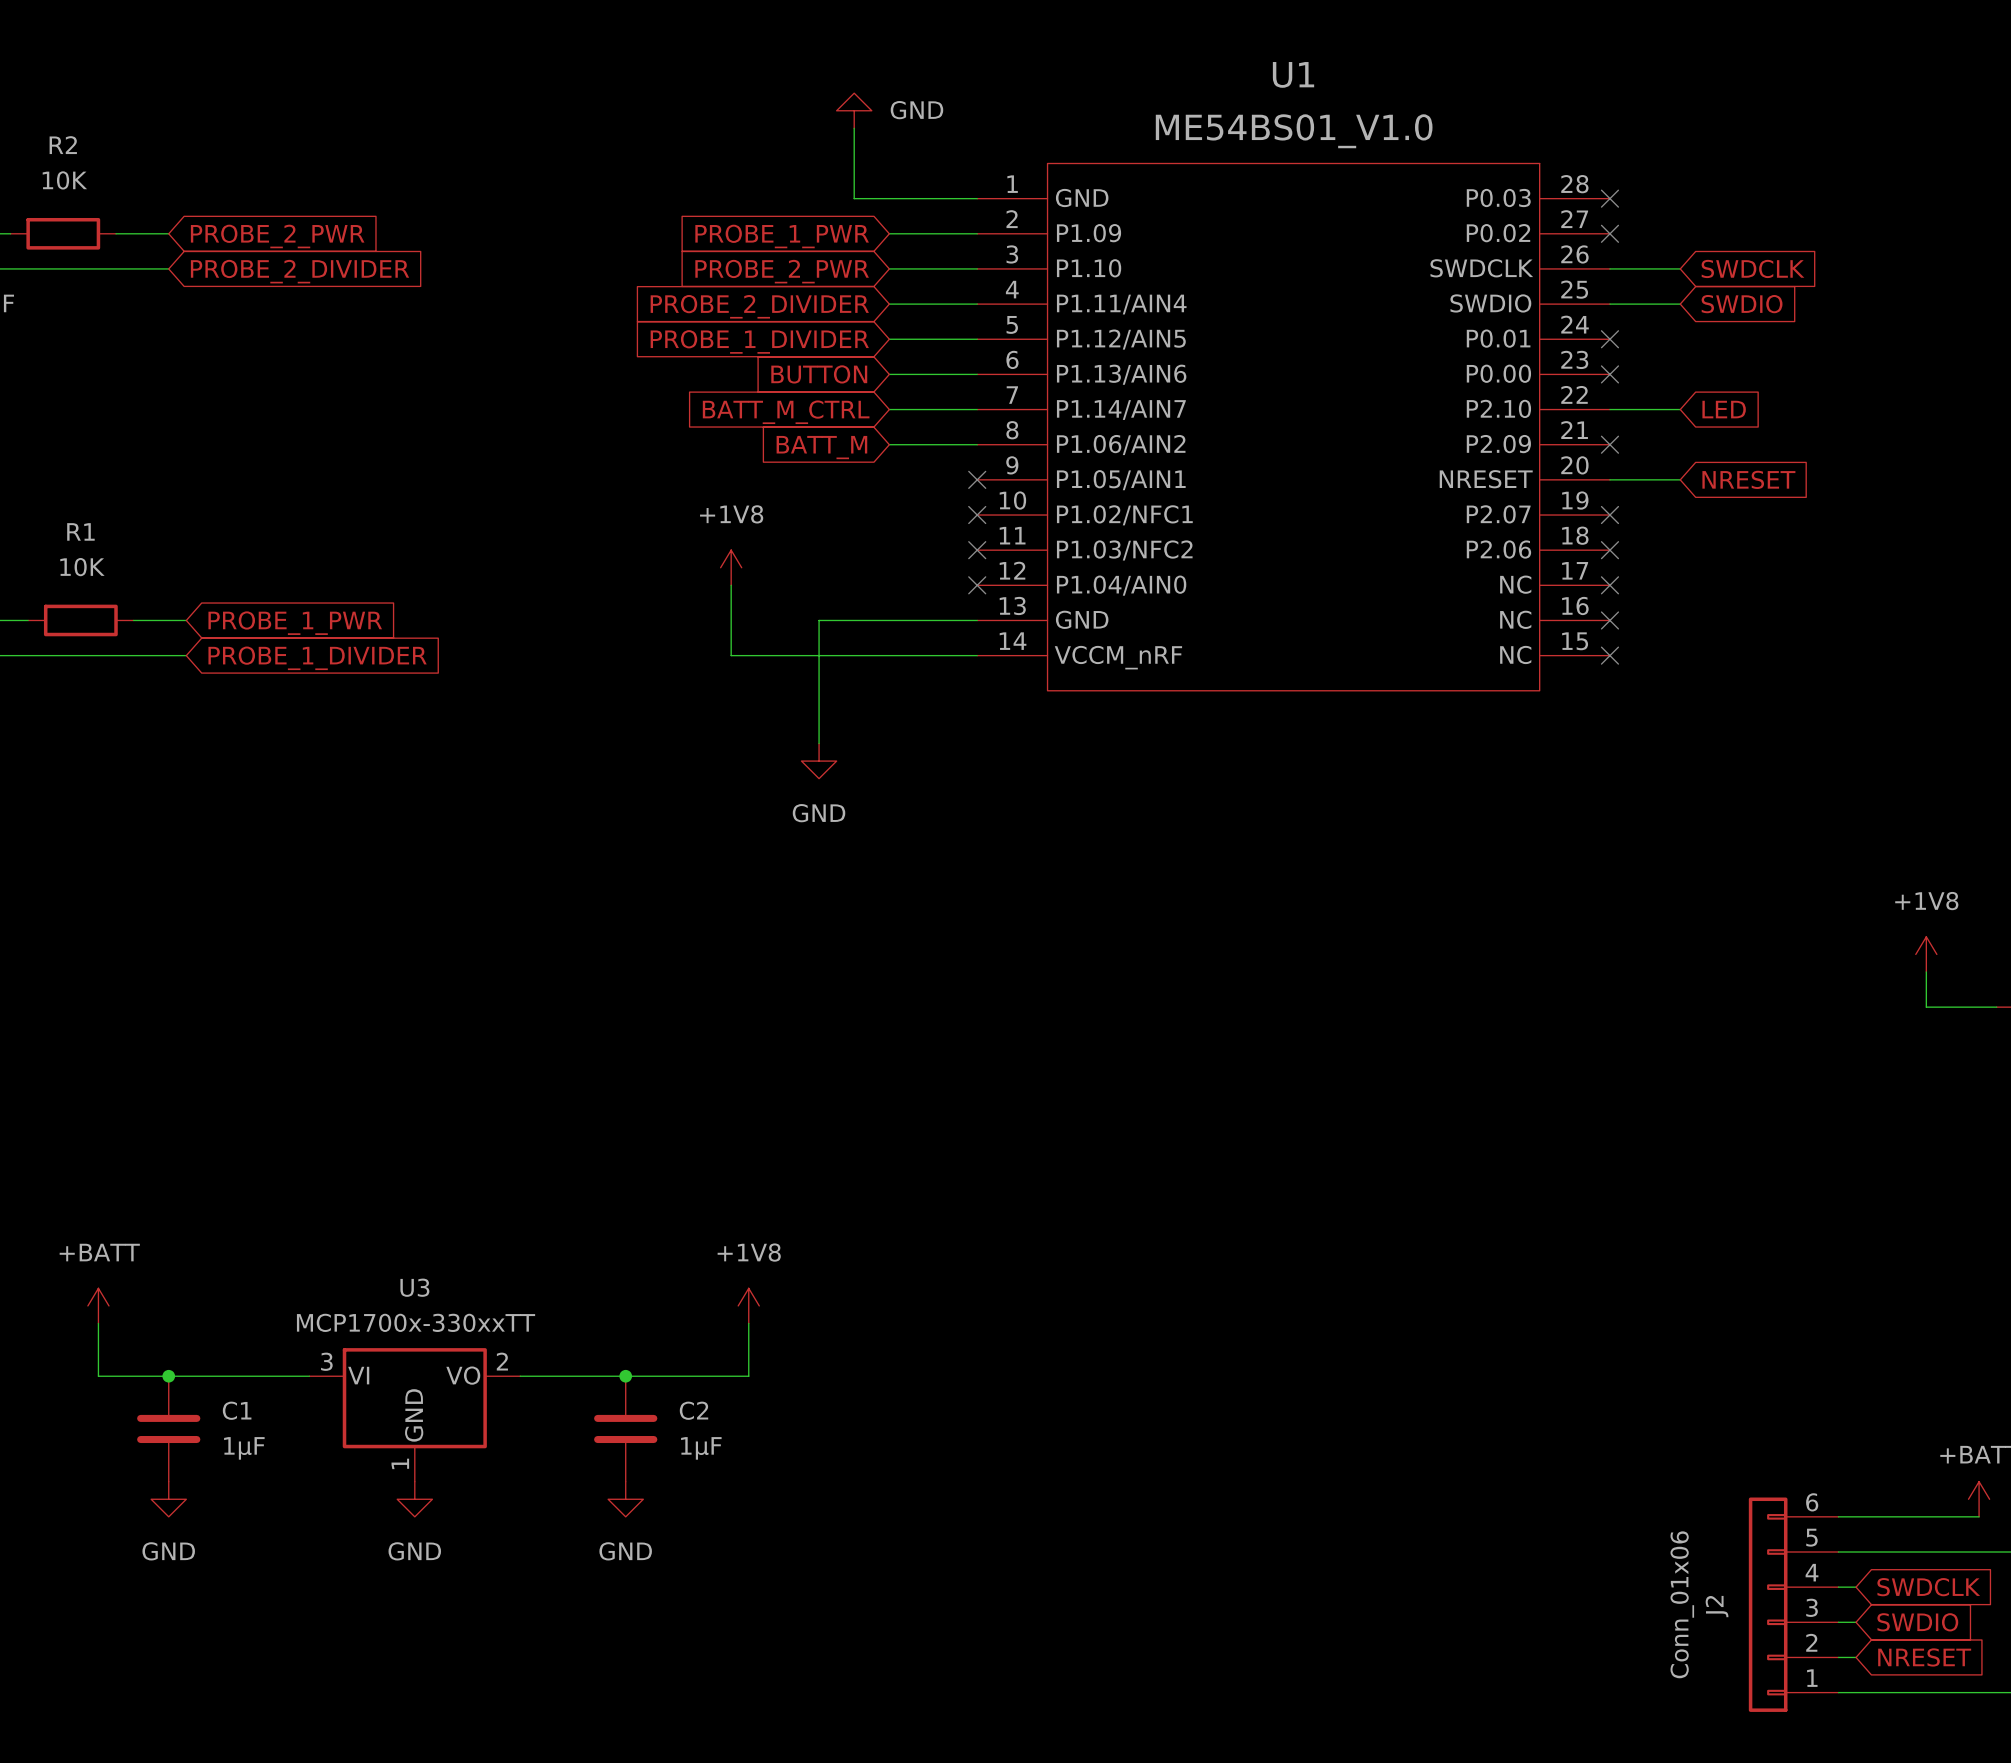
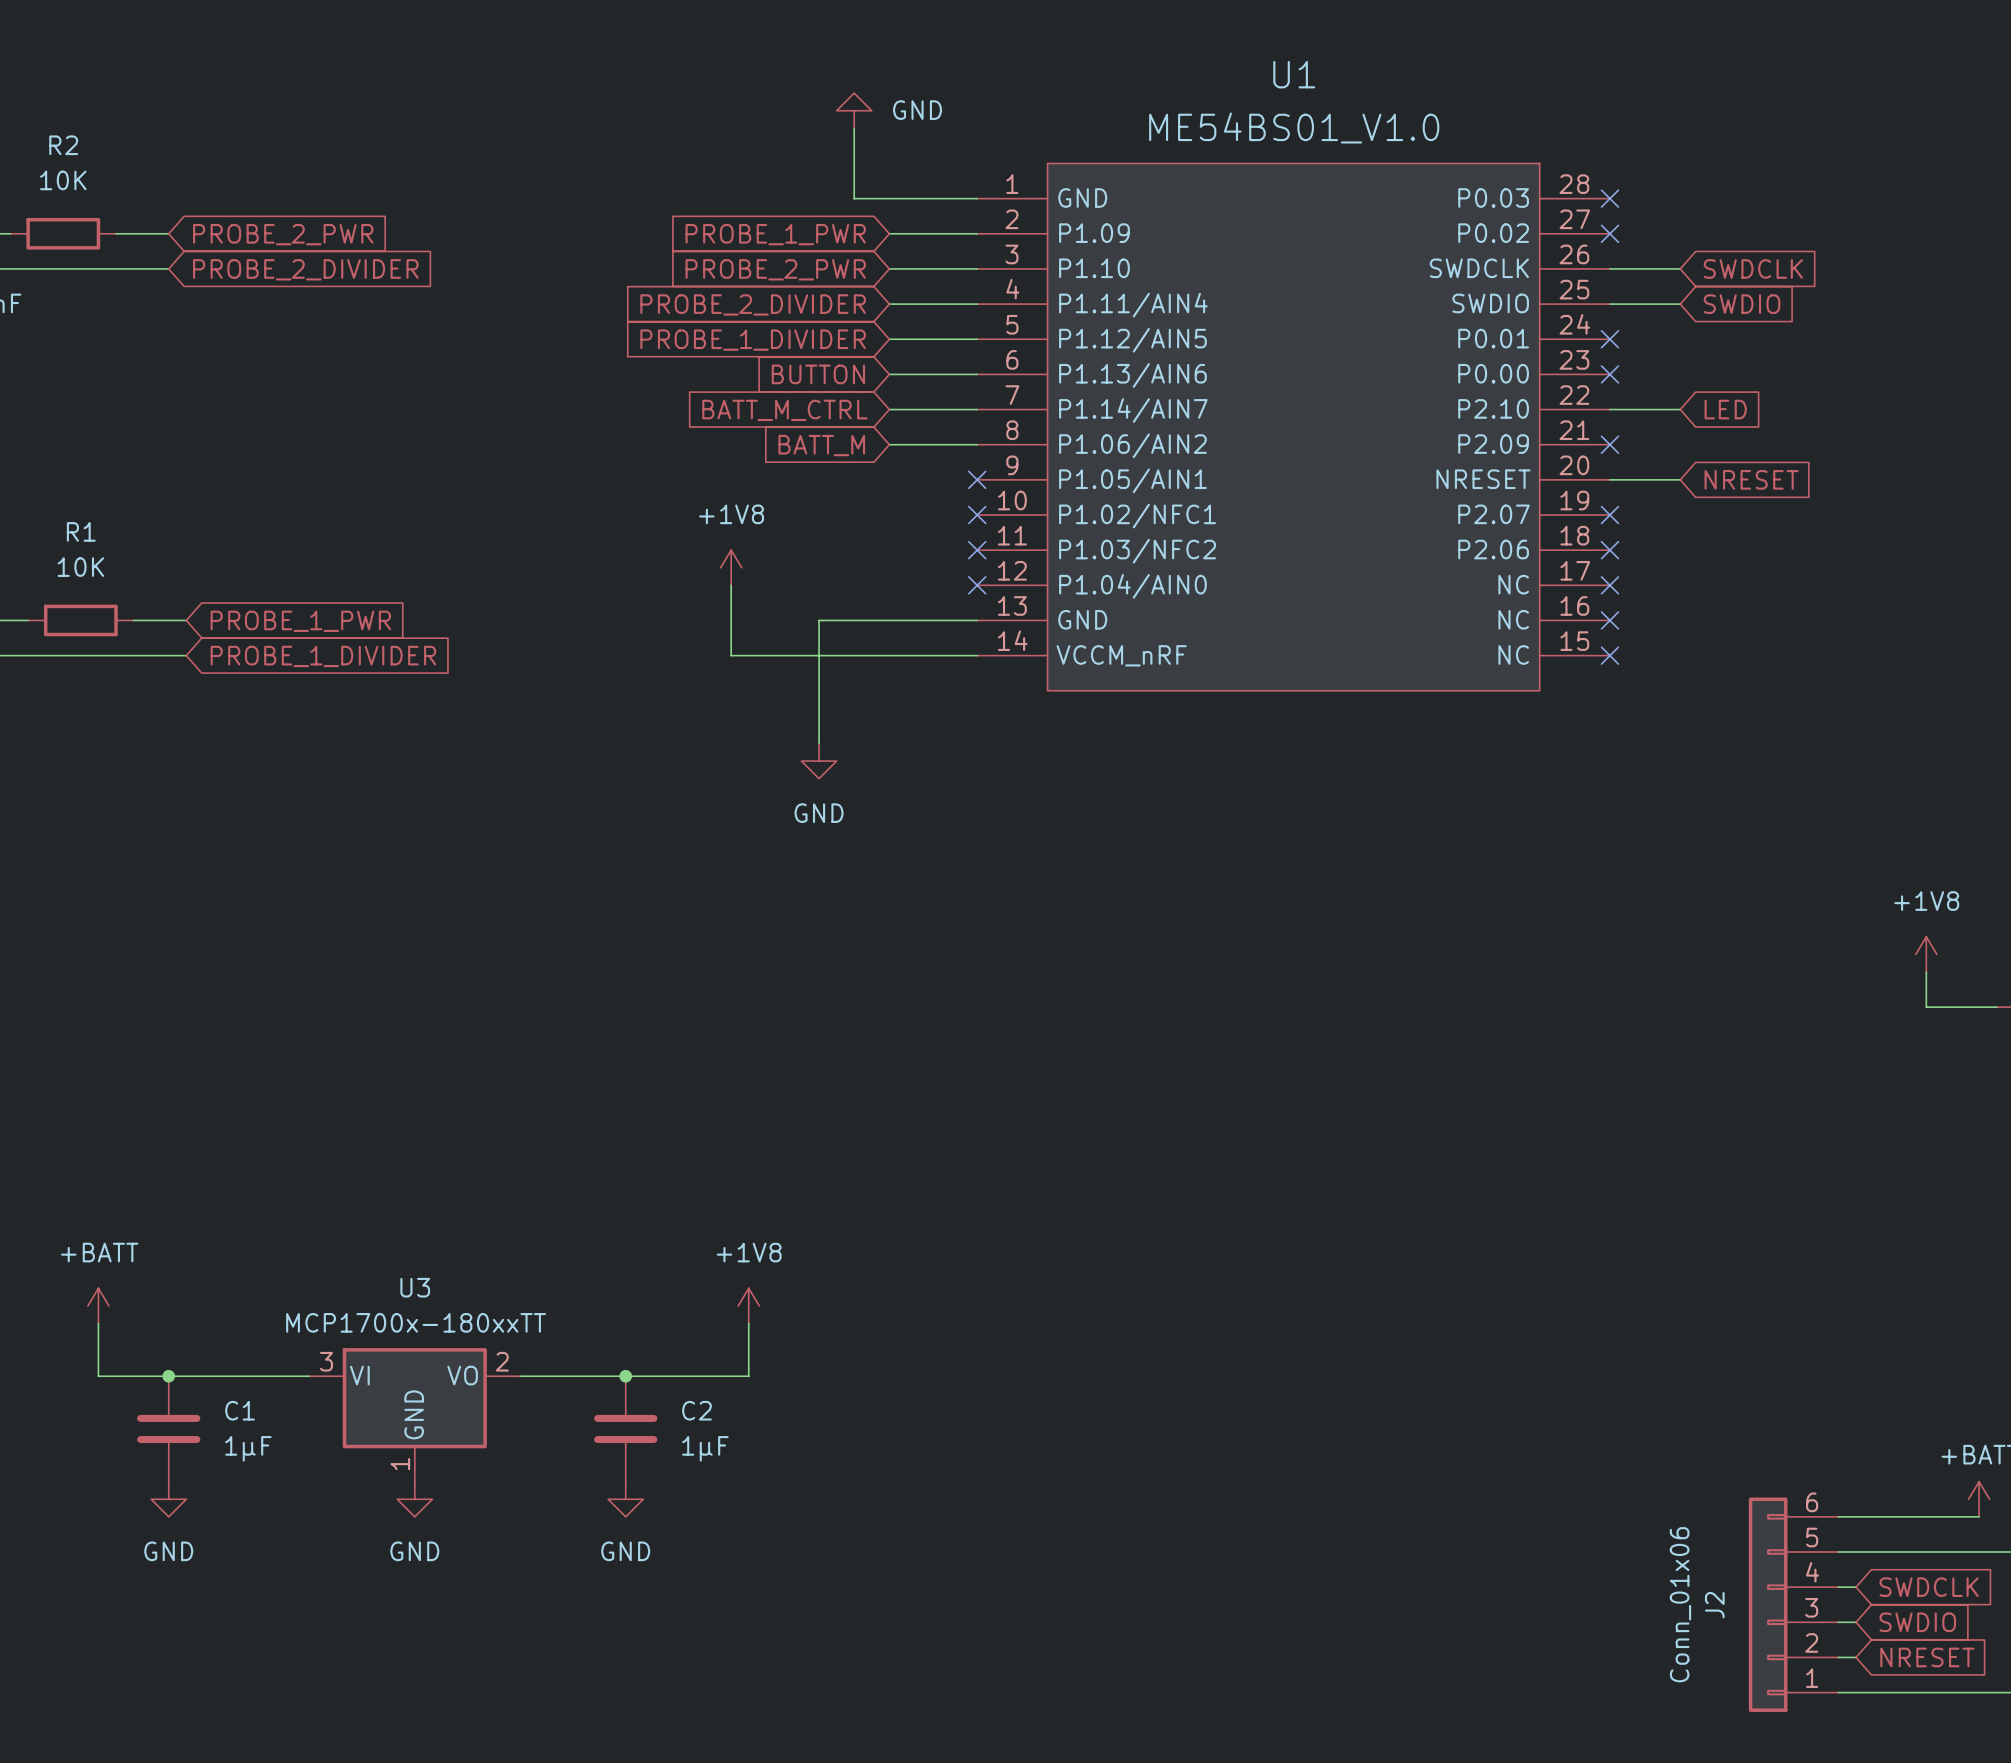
U3 value: MCP1700x-330xxTT (416, 1322) -> MCP1700x-180xxTT (416, 1322)

